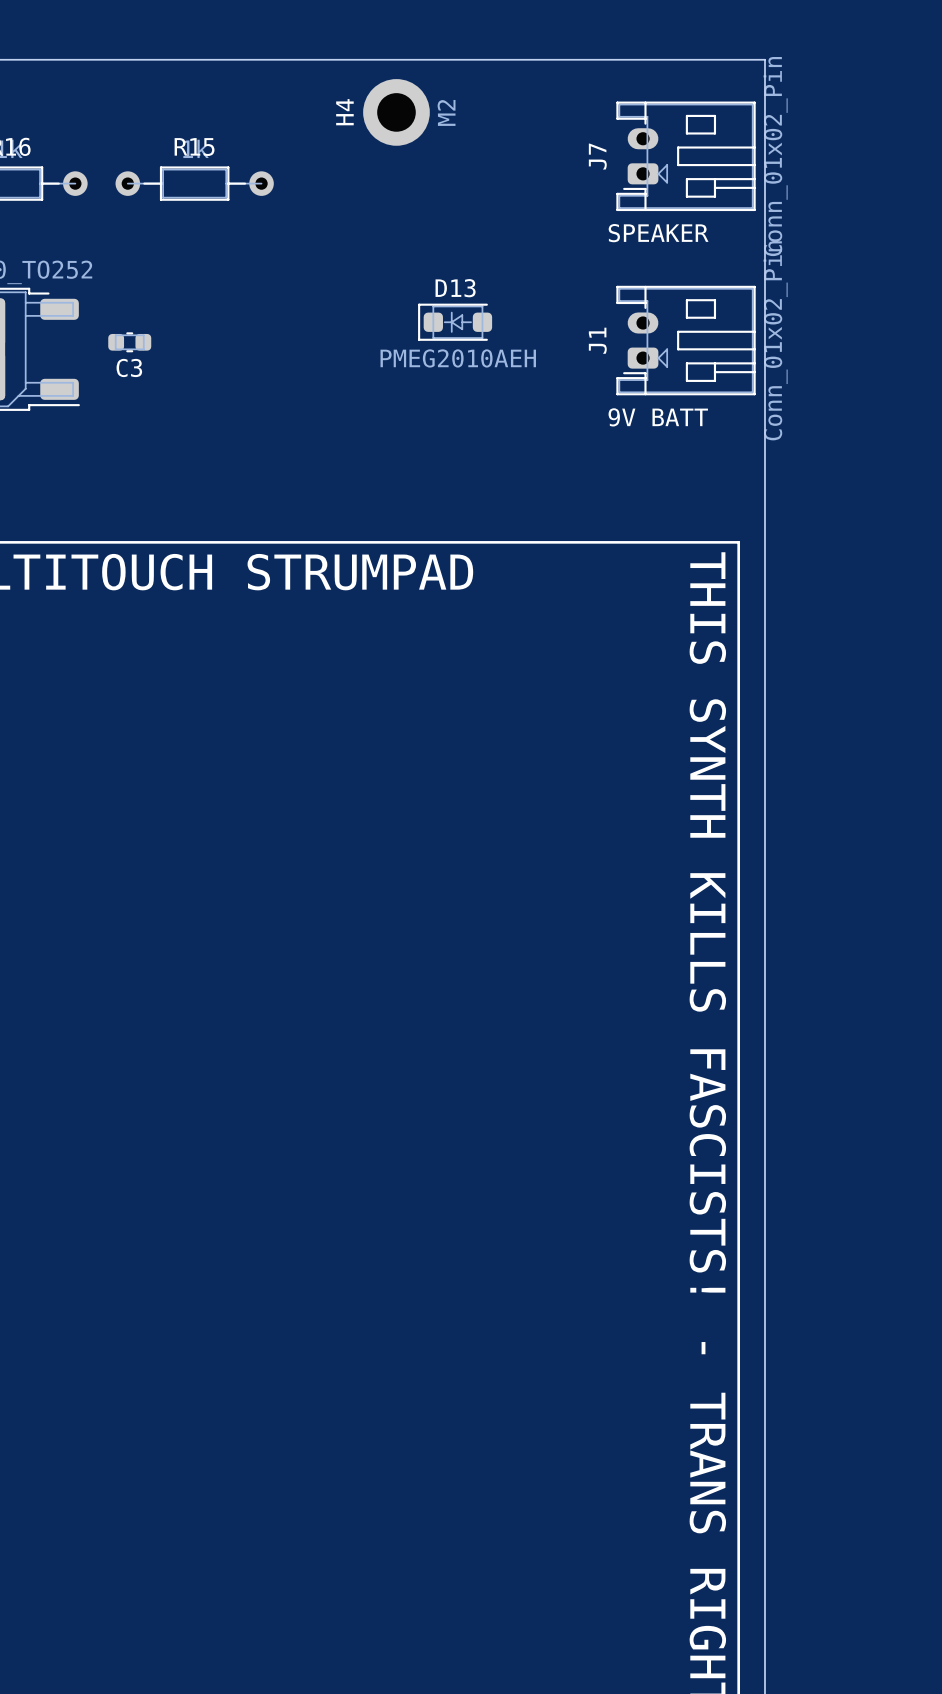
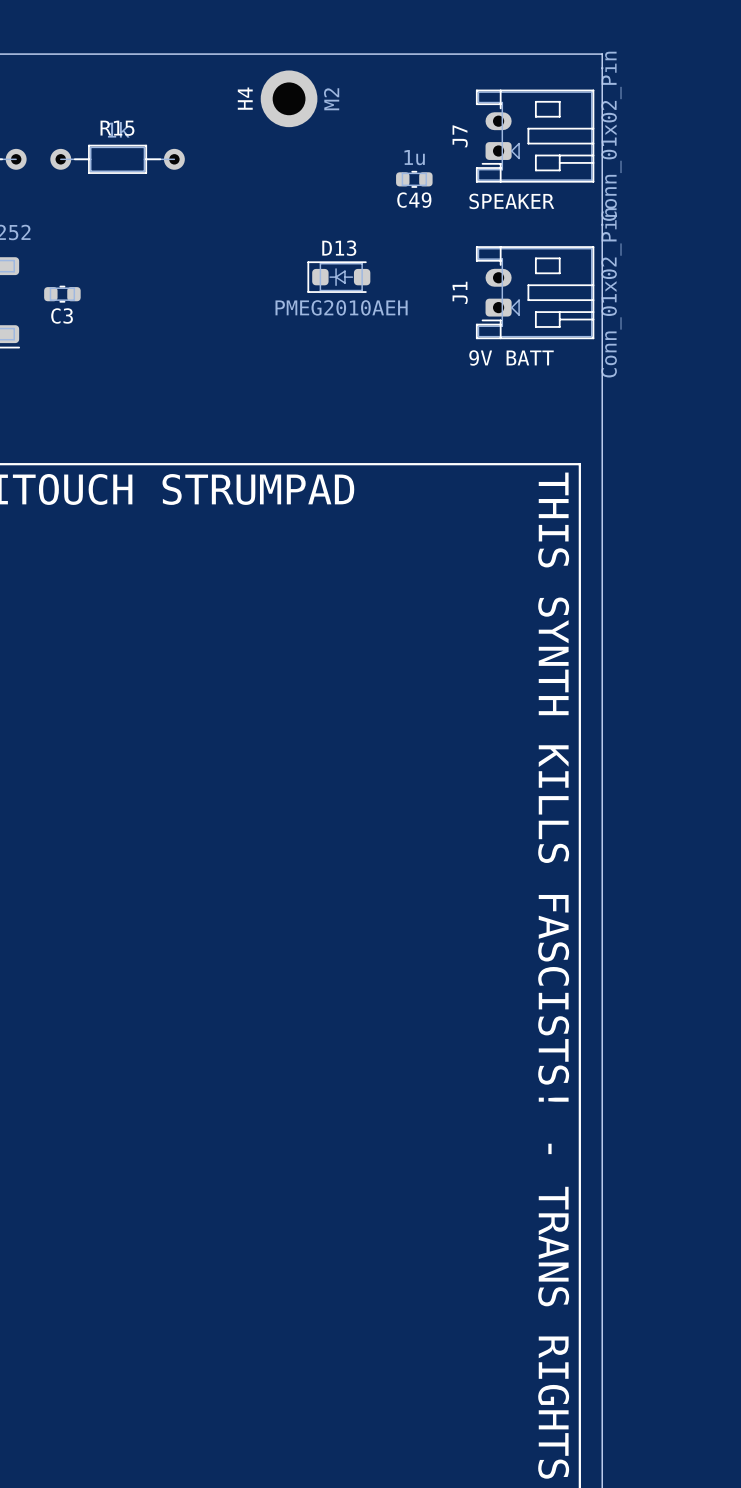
C49: none -> 1u (414, 179)

